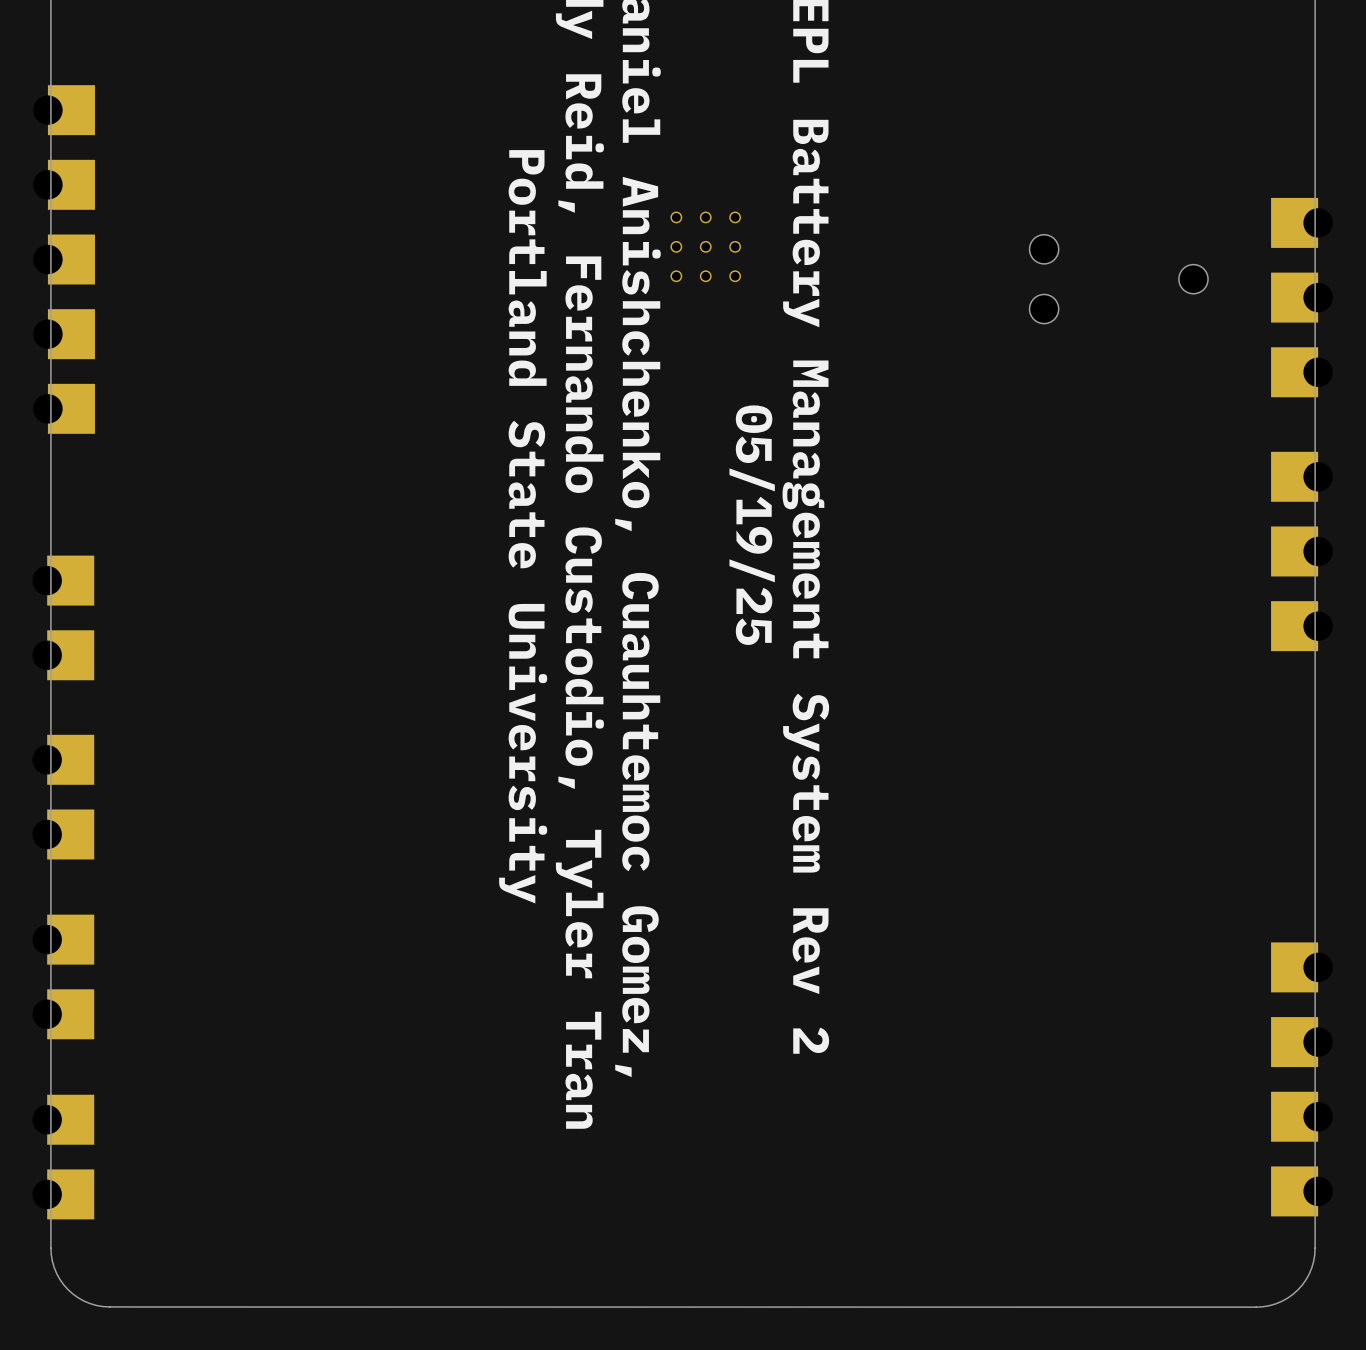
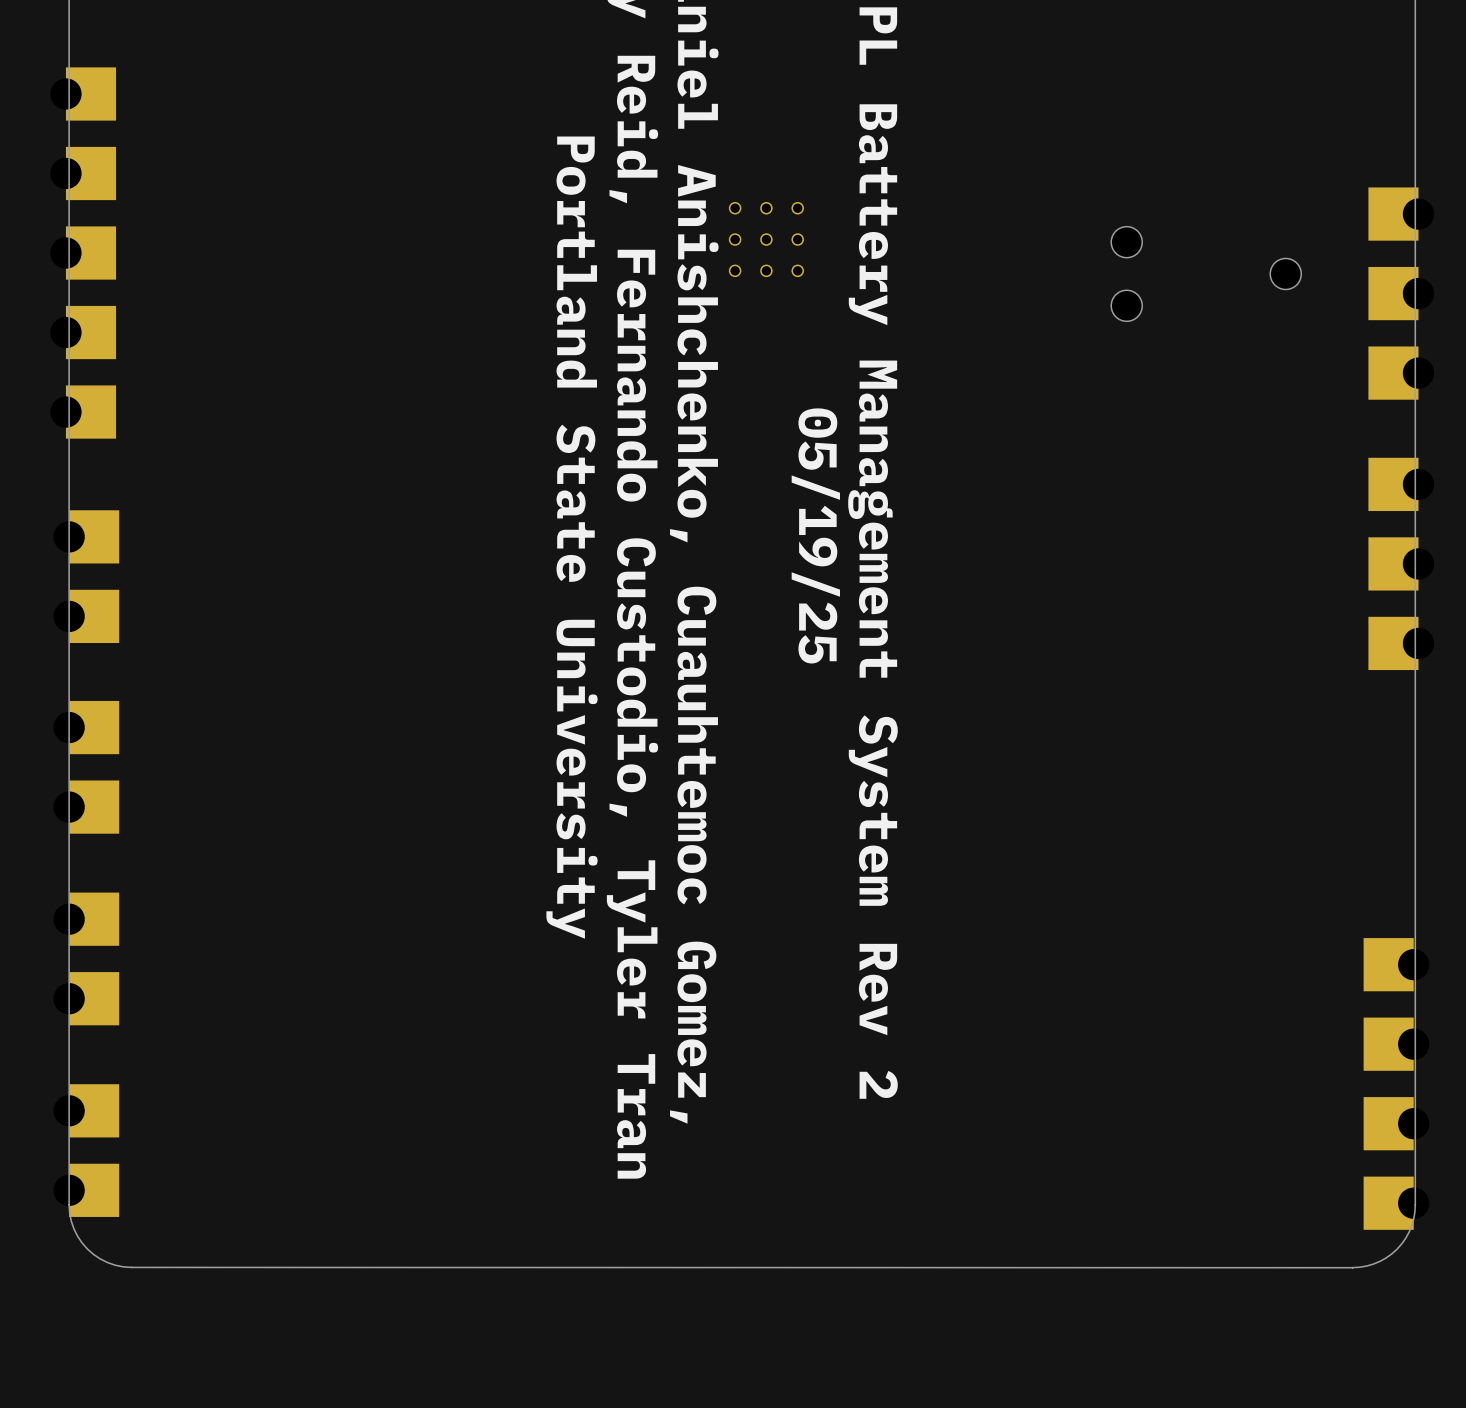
part position: (63, 617) -> (86, 576)
part position: (63, 797) -> (86, 767)
part position: (63, 976) -> (86, 958)
part position: (1301, 1079) -> (1396, 1083)
board edge: (50, 1153) (50, 1248) (54, 1267) (59, 1279) (73, 1294) (84, 1301) (103, 1306) (1256, 1307) -> (69, 1204) (73, 1228) (87, 1249) (107, 1262) (131, 1267) (1352, 1267)
board edge: (1315, 1153) (1315, 1248) (1311, 1267) (1302, 1284) (1287, 1298) (1275, 1303) (1256, 1307) -> (1415, 1204) (1413, 1218) (1409, 1232) (1397, 1249) (1386, 1257) (1373, 1264) (1352, 1267)
part position: (63, 1157) -> (86, 1150)

